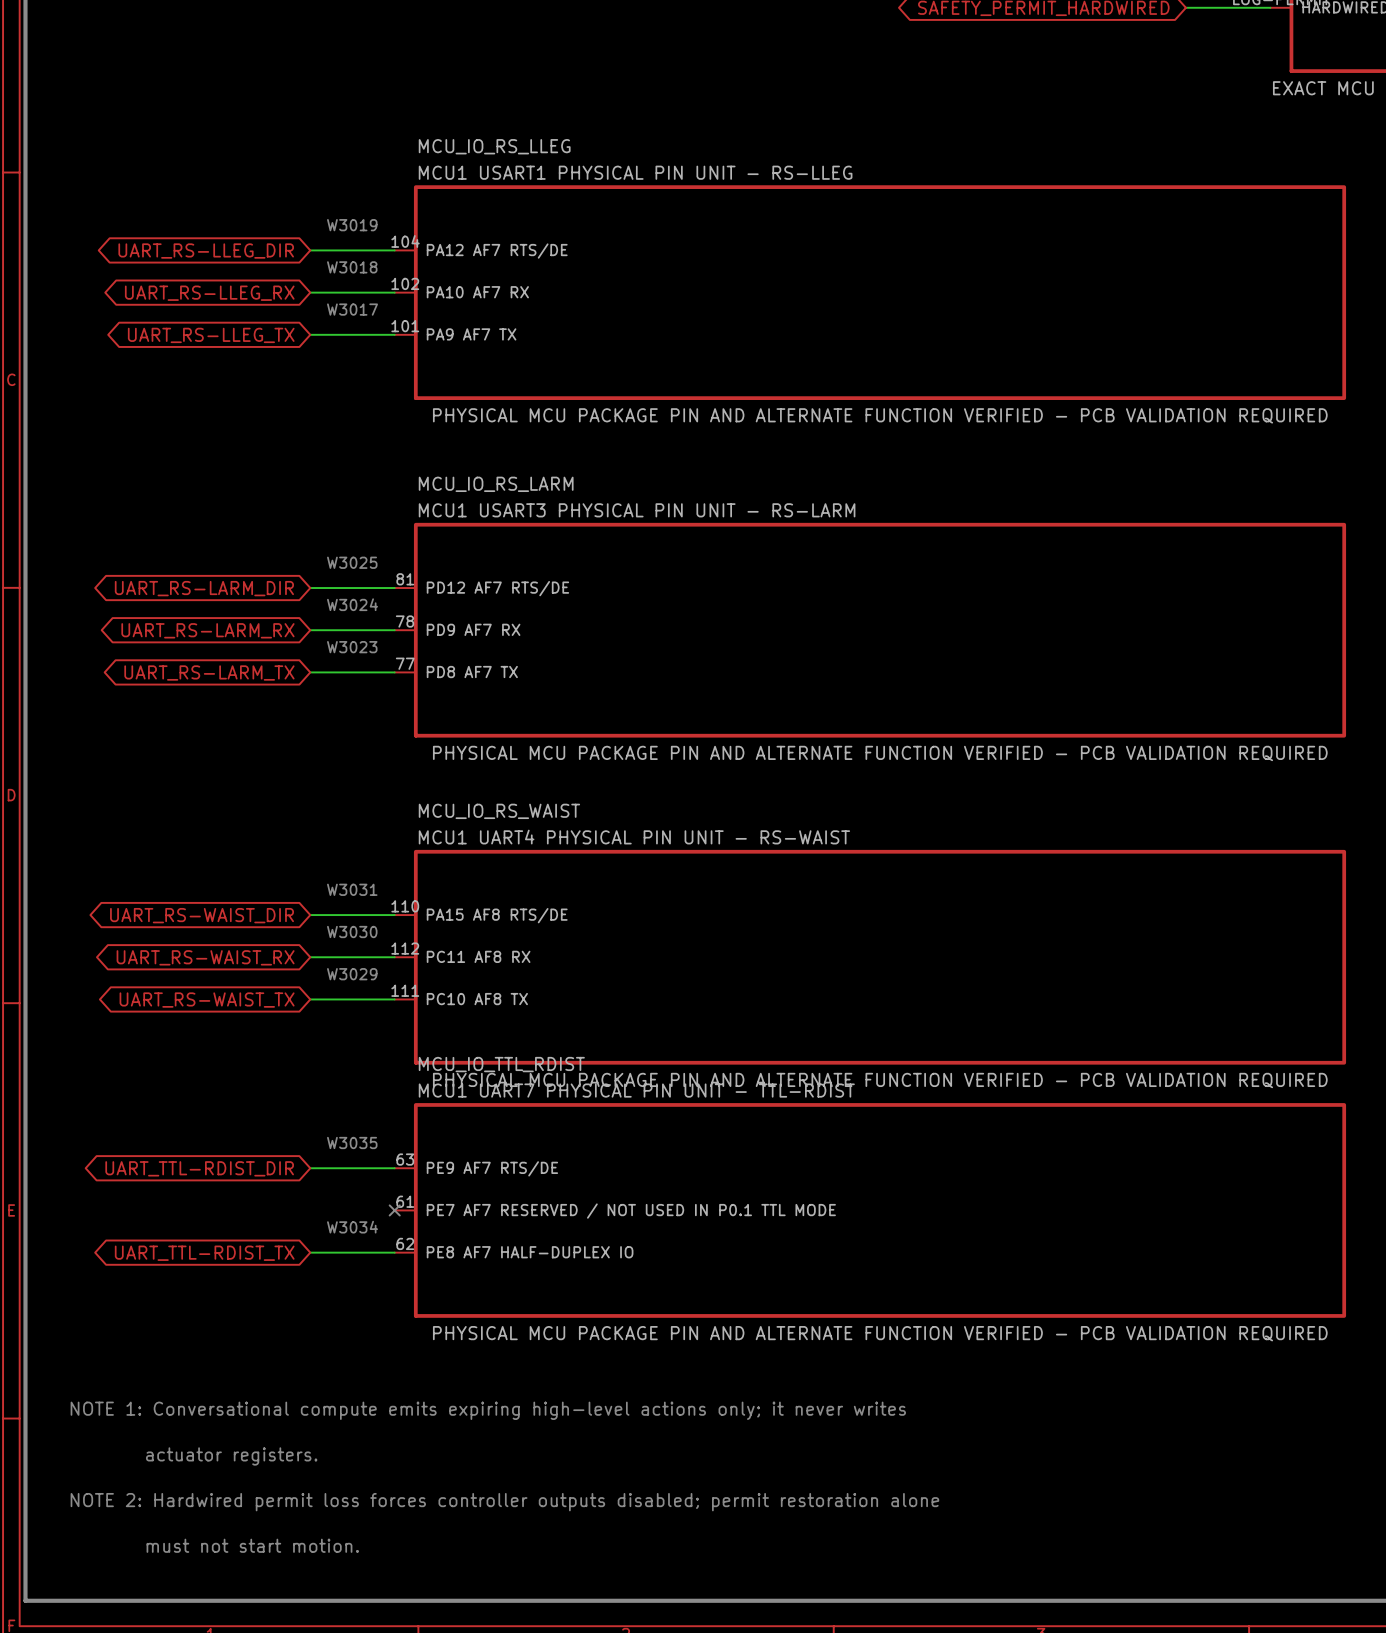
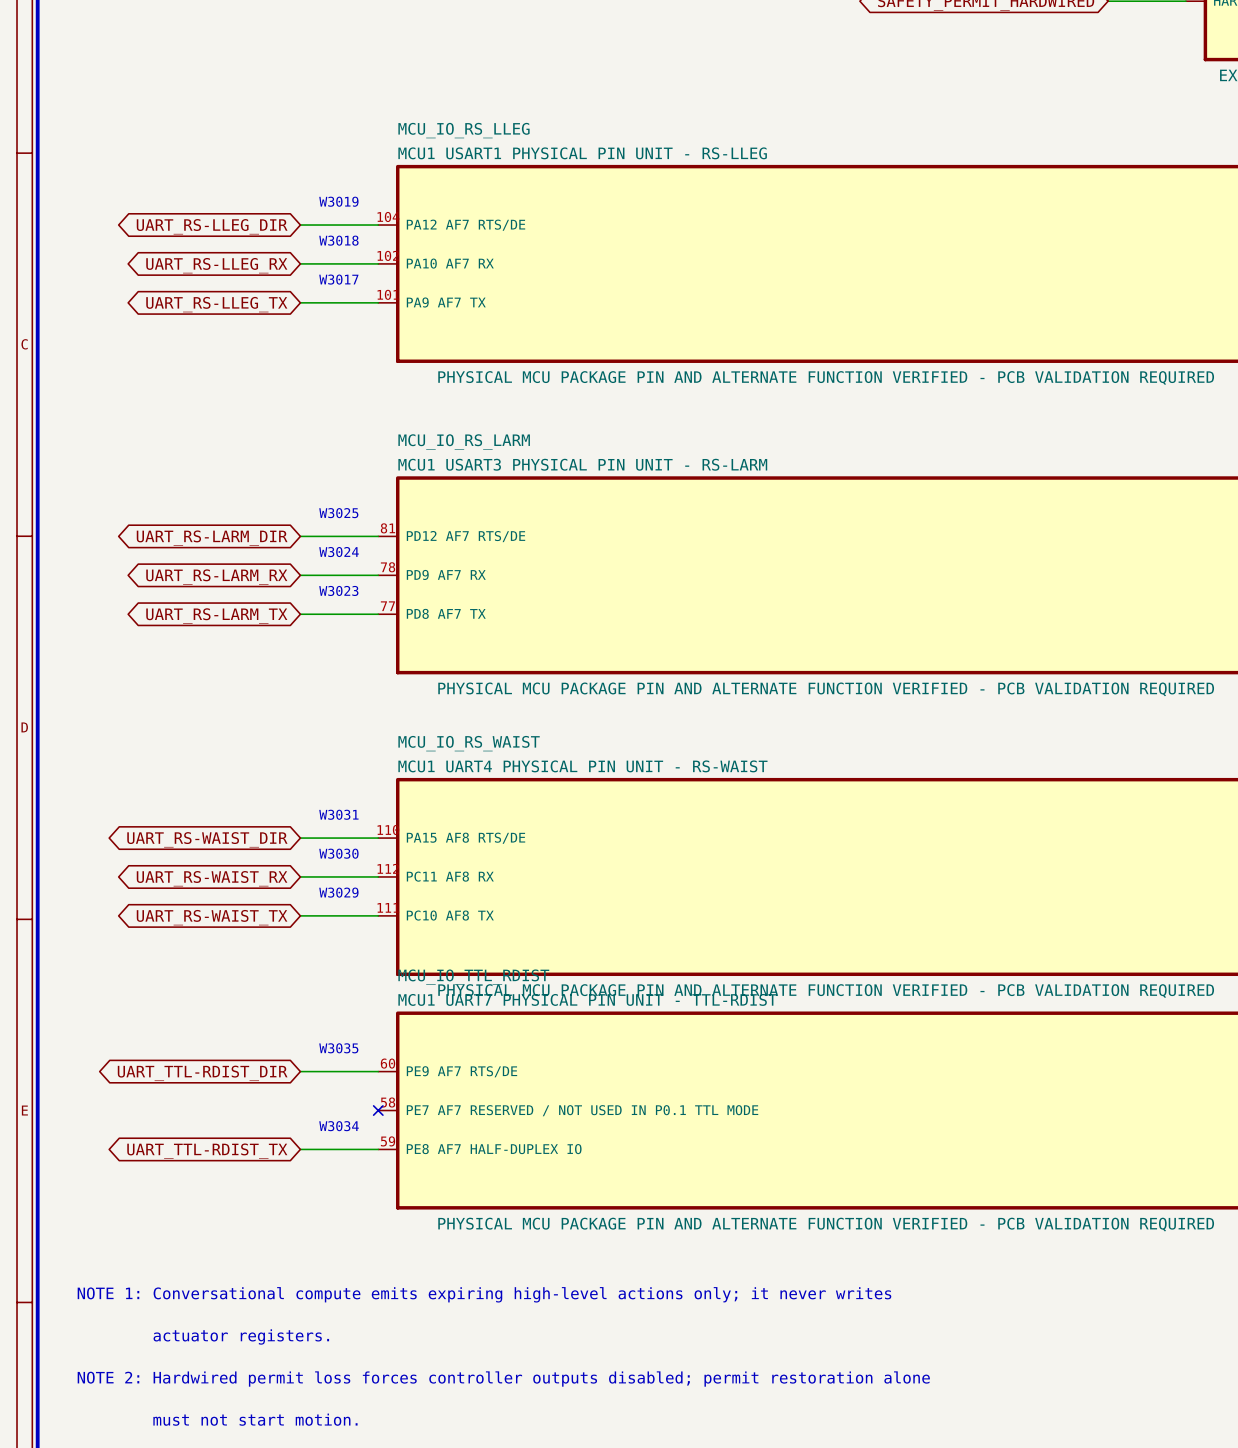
MCU_IO_TTL_RDIST pin number: 63 (405, 1159) -> 60 (388, 1063)
MCU_IO_TTL_RDIST pin number: 61 (405, 1201) -> 58 (388, 1102)
MCU_IO_TTL_RDIST pin number: 62 (405, 1243) -> 59 (388, 1141)

